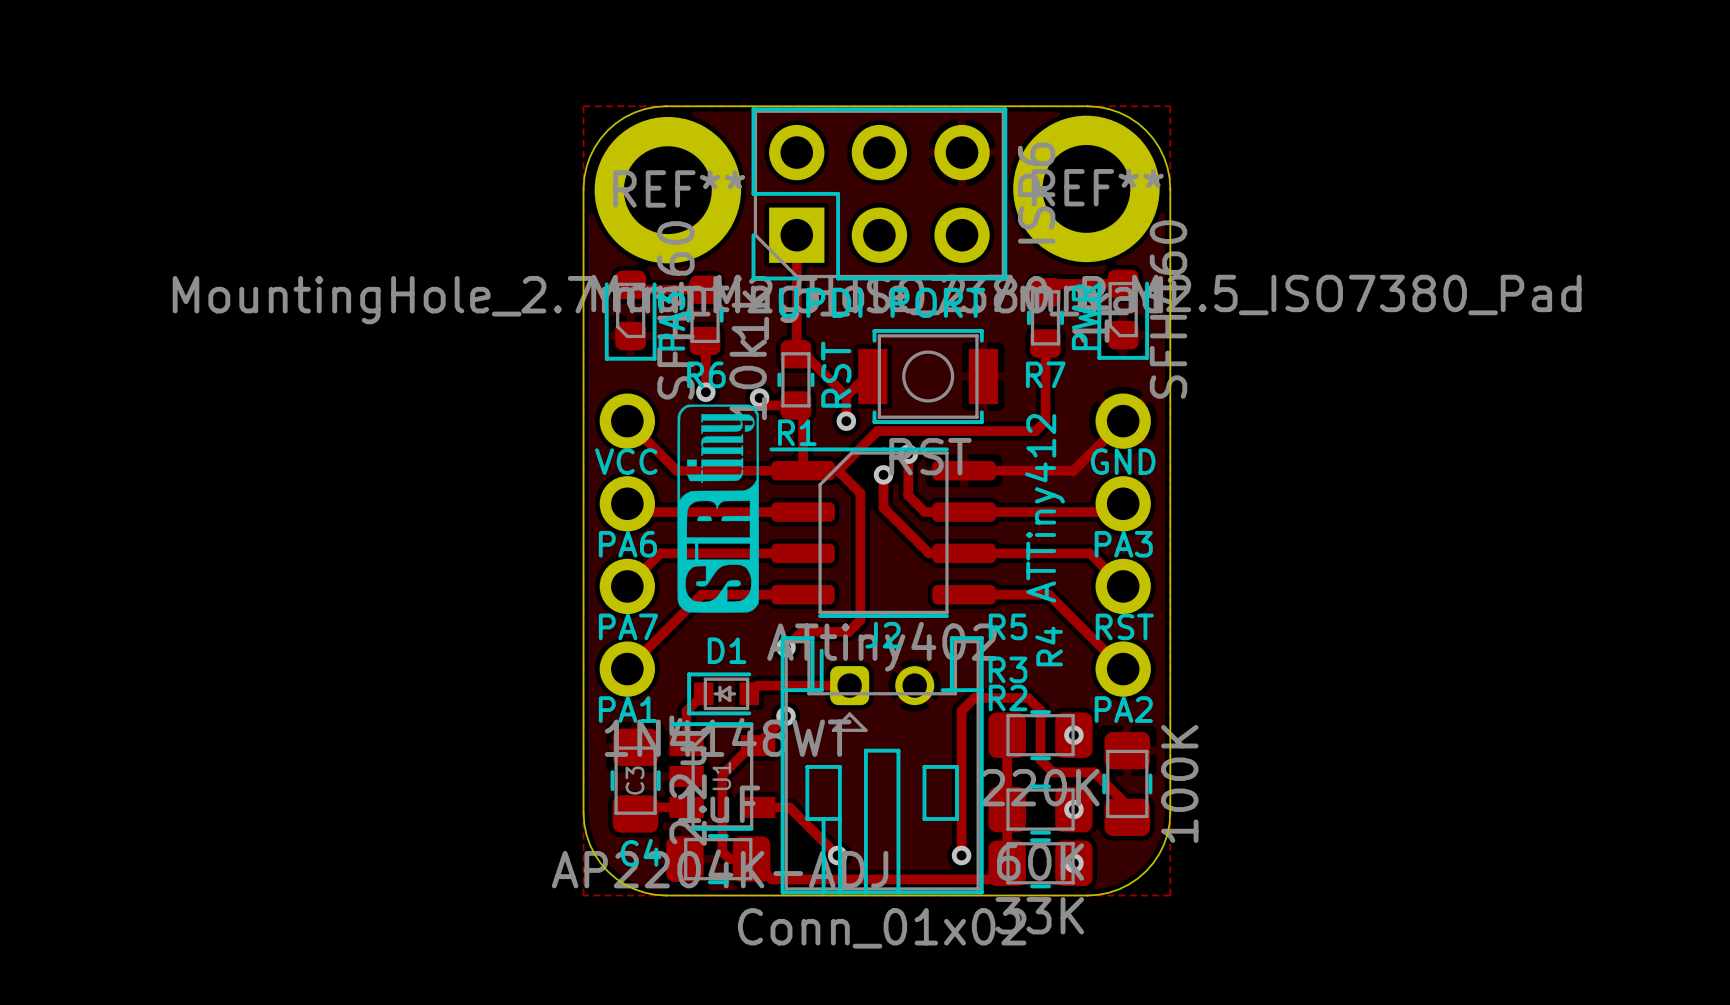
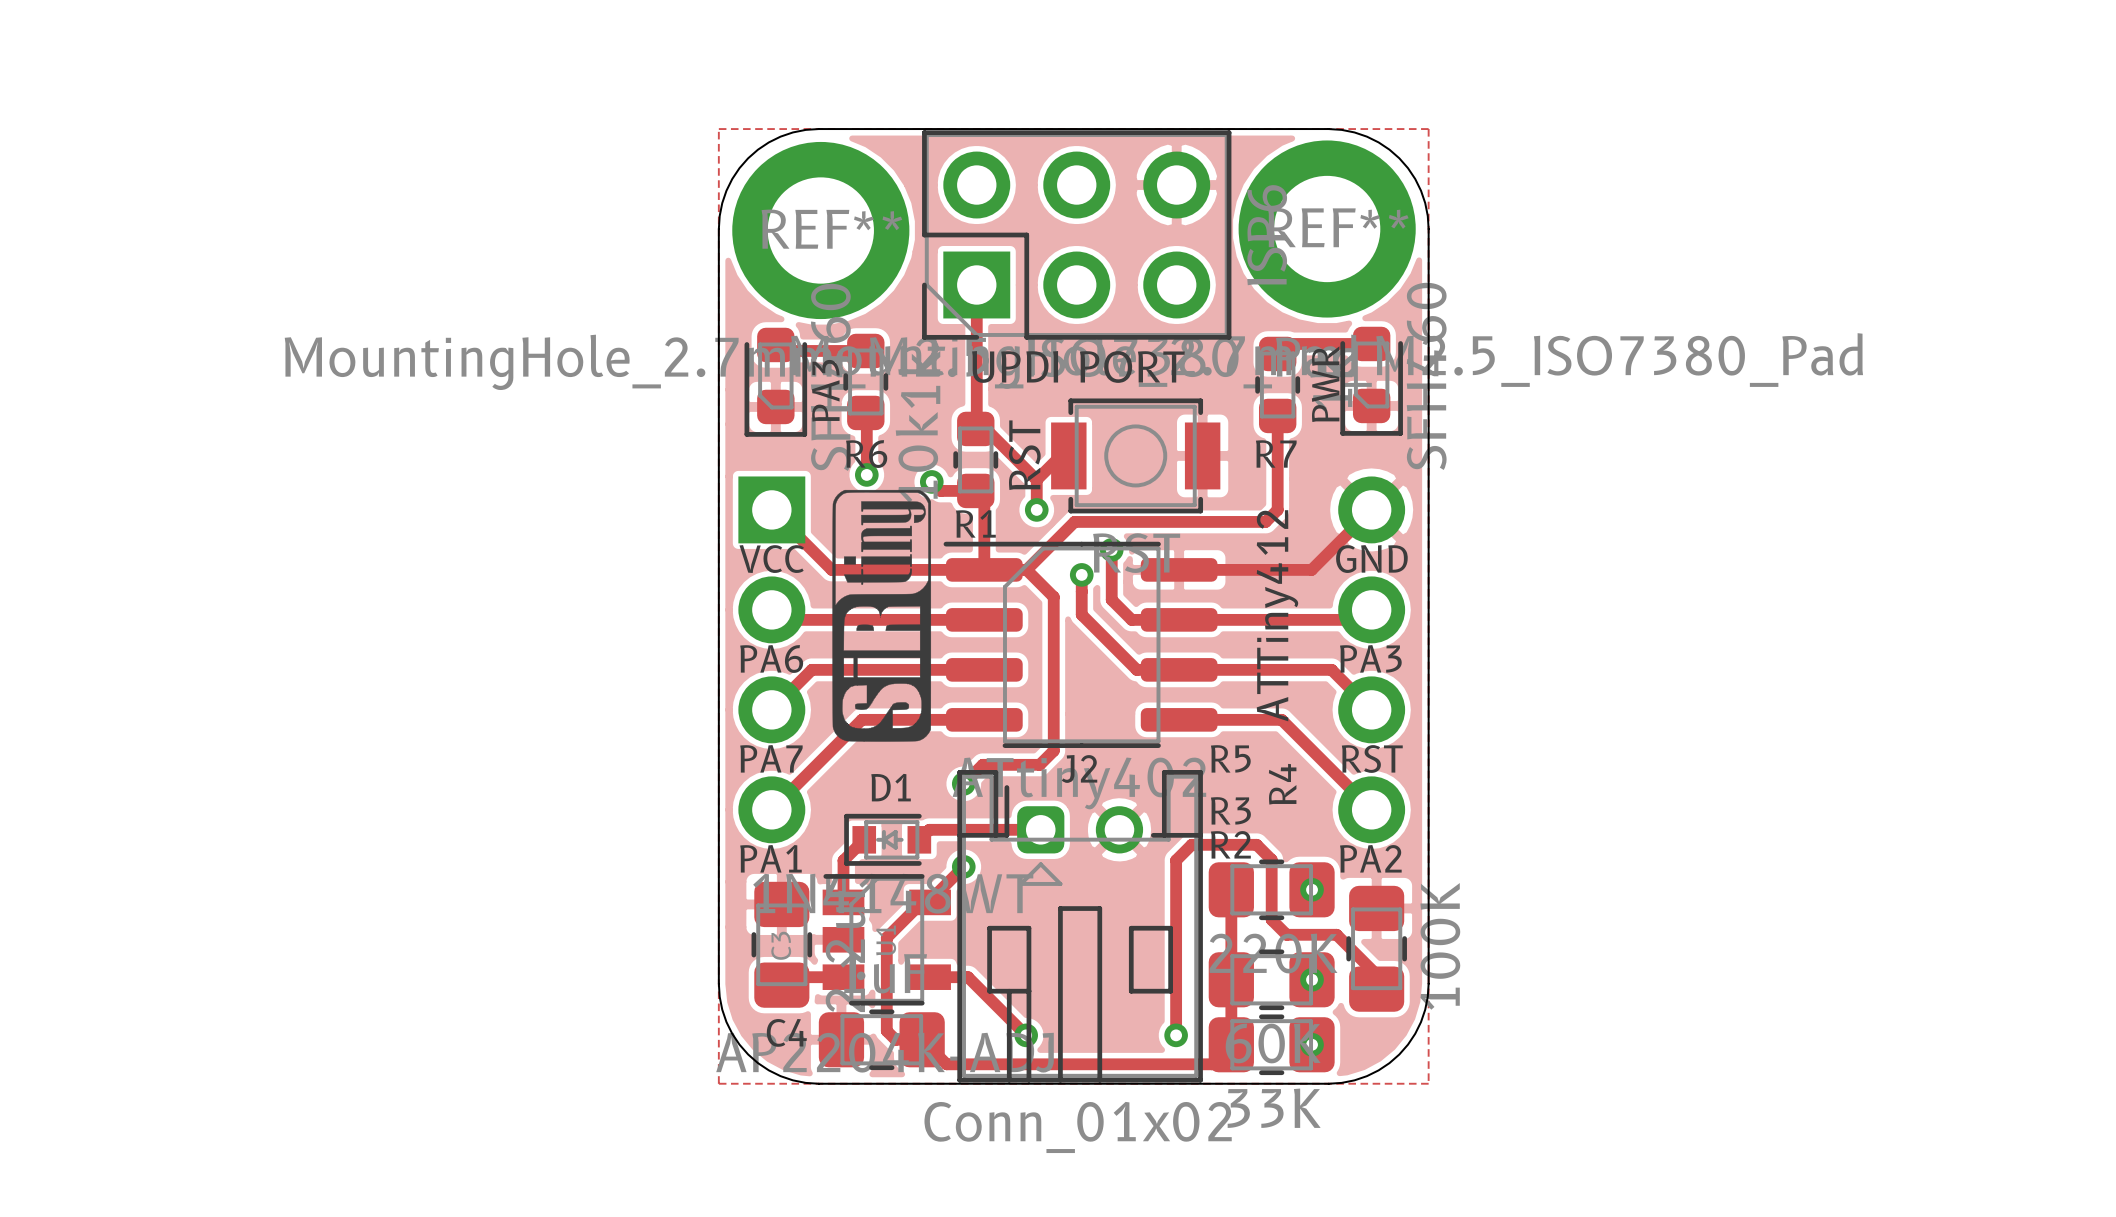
part footprint: [599, 393, 656, 697] -> [738, 476, 806, 844]

